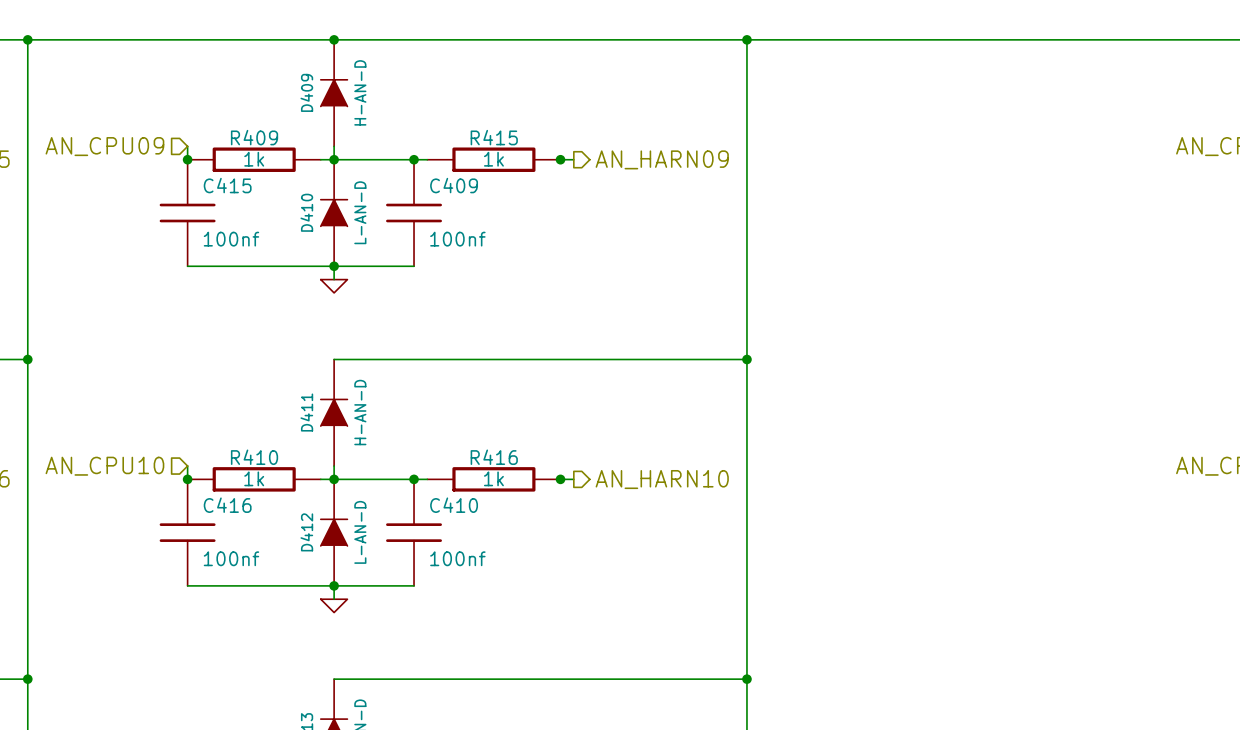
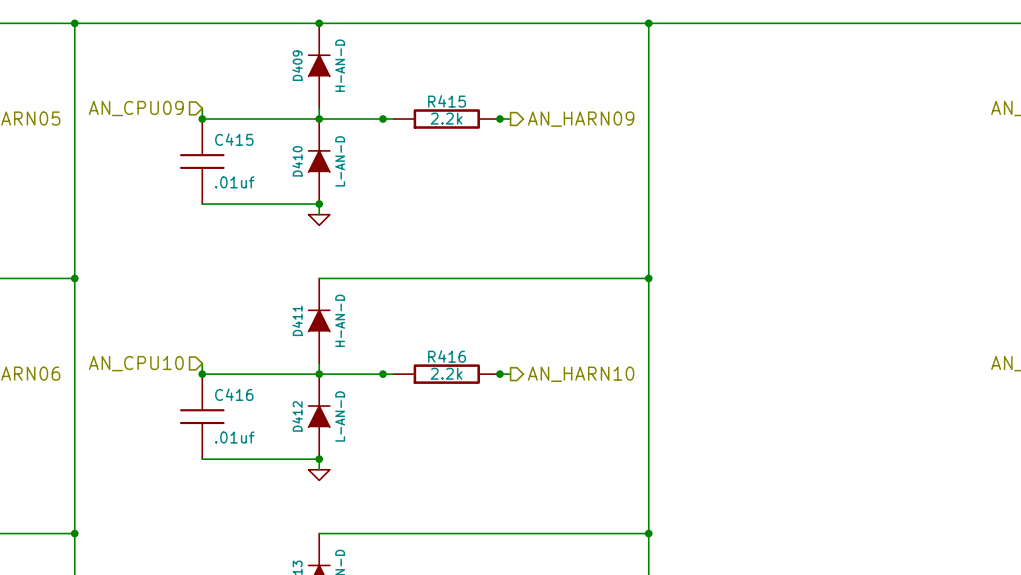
wire: none -> (202, 119) (308, 119)
R409: 1k (254, 159) -> none
R415 value: 1k (493, 159) -> 2.2k (446, 118)
C409: 100nf (414, 213) -> none
C415 value: 100nf (231, 239) -> .01uf (234, 182)
wire: (334, 266) (414, 266) -> none
R416 value: 1k (493, 478) -> 2.2k (446, 373)
wire: none -> (202, 374) (308, 374)
R410: 1k (254, 479) -> none
C410: 100nf (414, 532) -> none
C416 value: 100nf (231, 558) -> .01uf (234, 437)
wire: (334, 585) (414, 585) -> none

